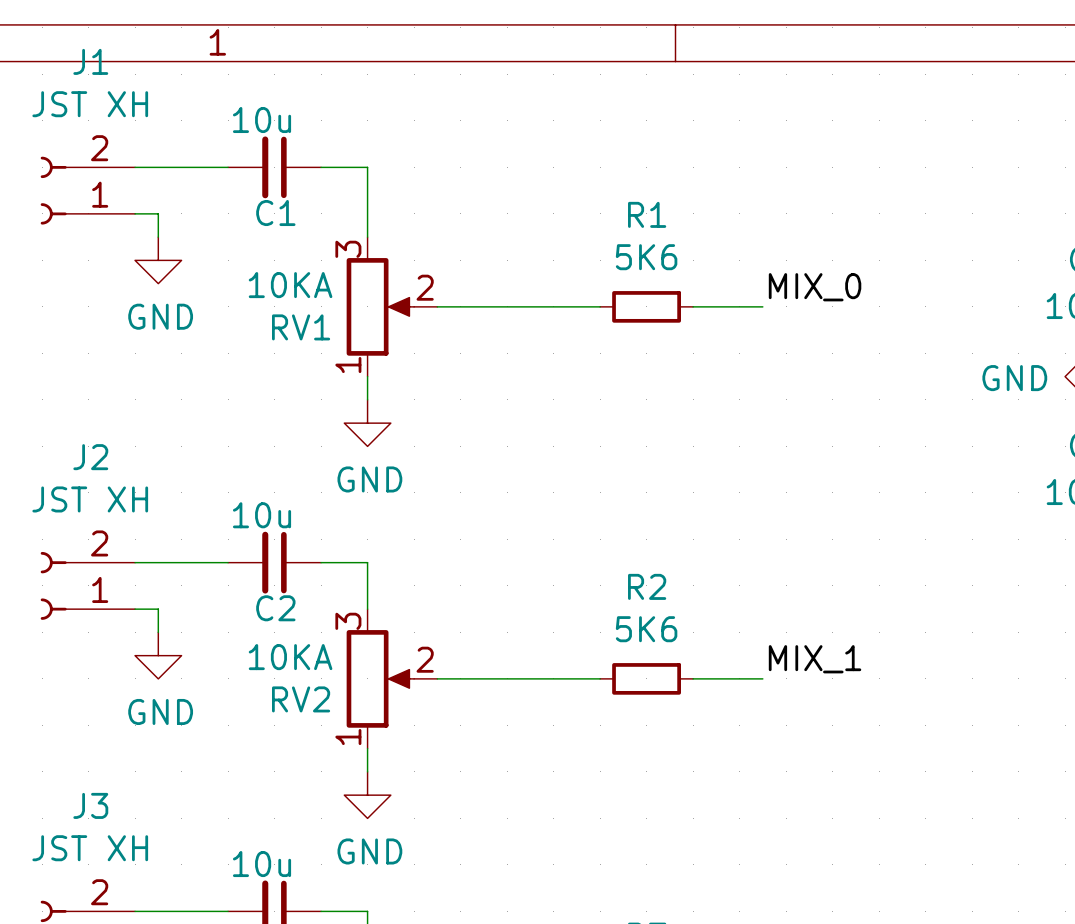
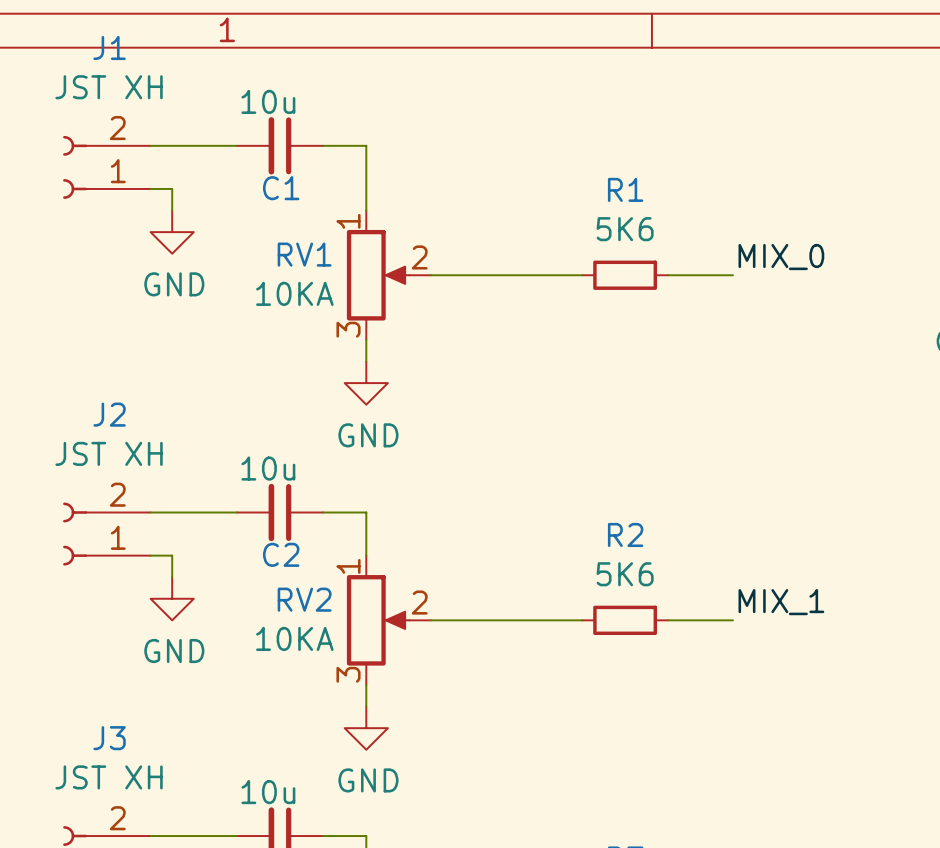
RV1 flip: as is (380, 306) -> up-down (378, 275)
RV2 flip: as is (380, 678) -> up-down (378, 620)

